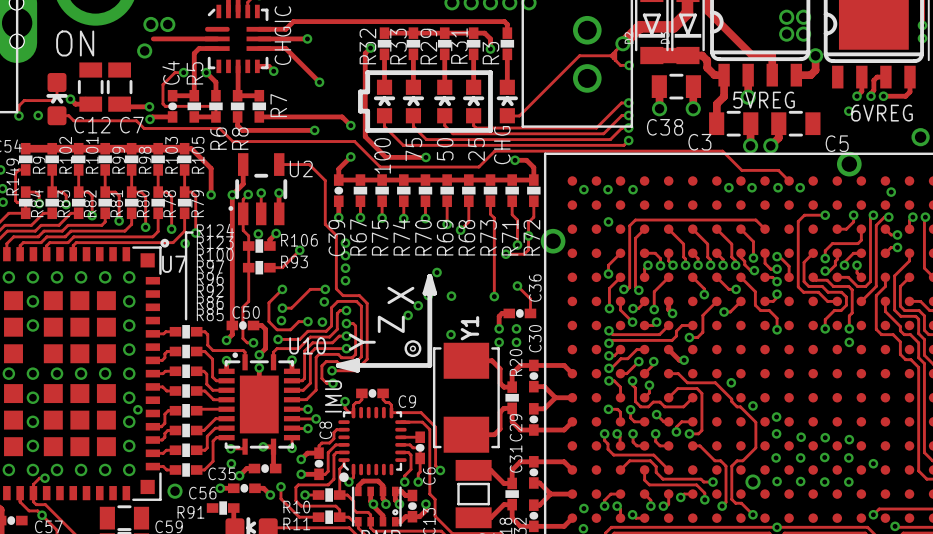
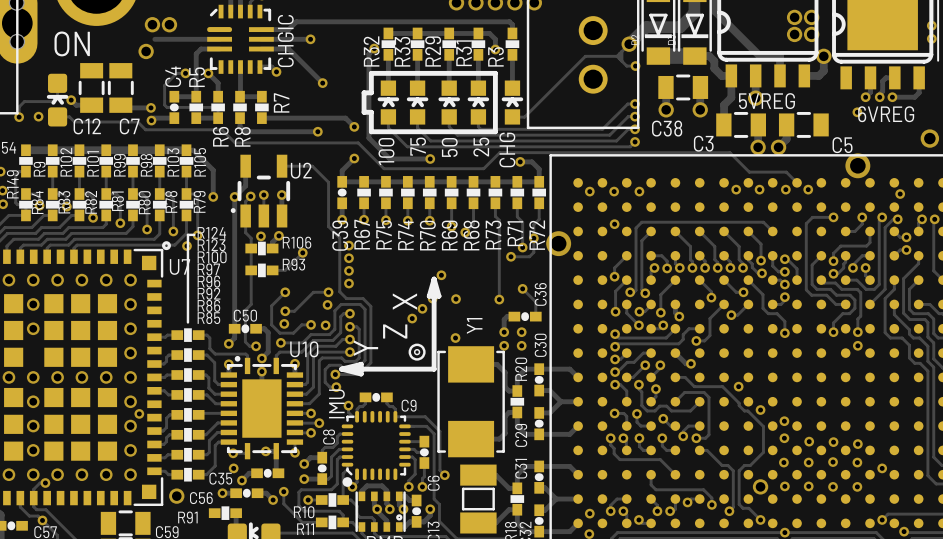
track: (620, 469) (629, 460) (650, 460) (656, 466) (656, 472) (662, 479) (700, 479) (703, 482) (713, 482) -> none
via: (713, 482) -> none

